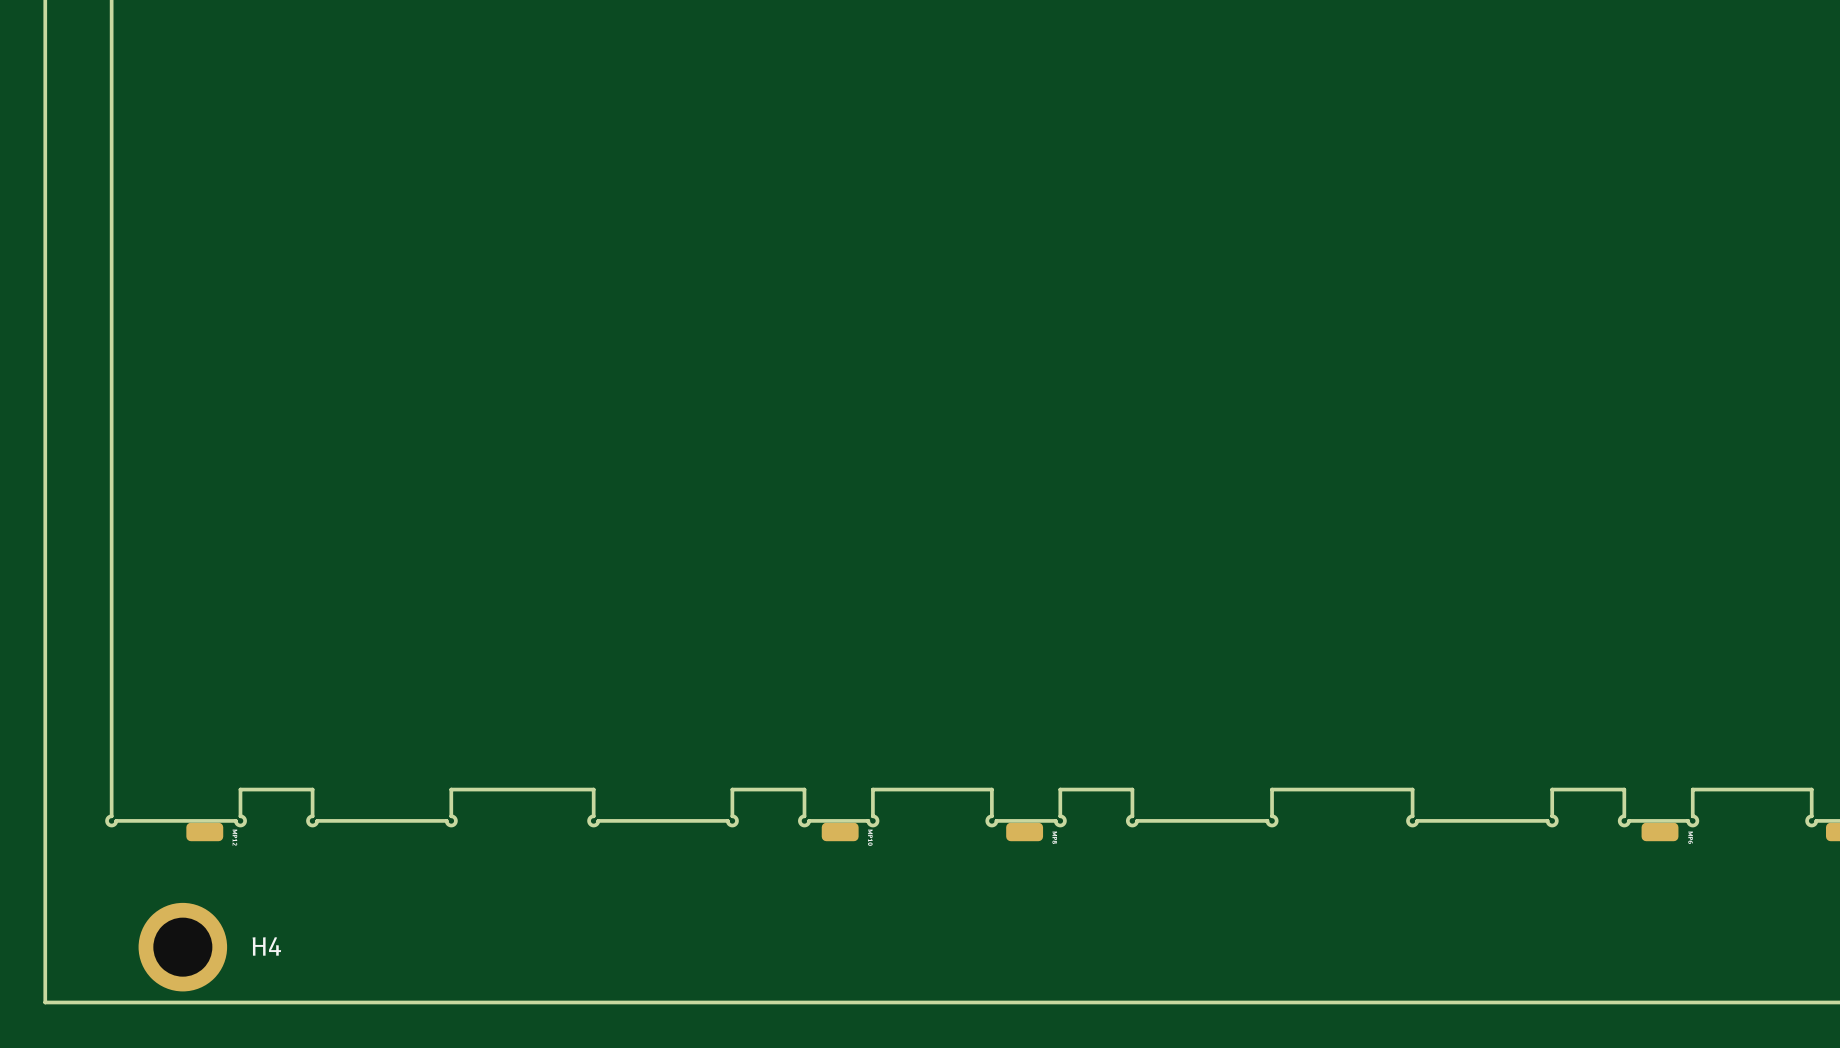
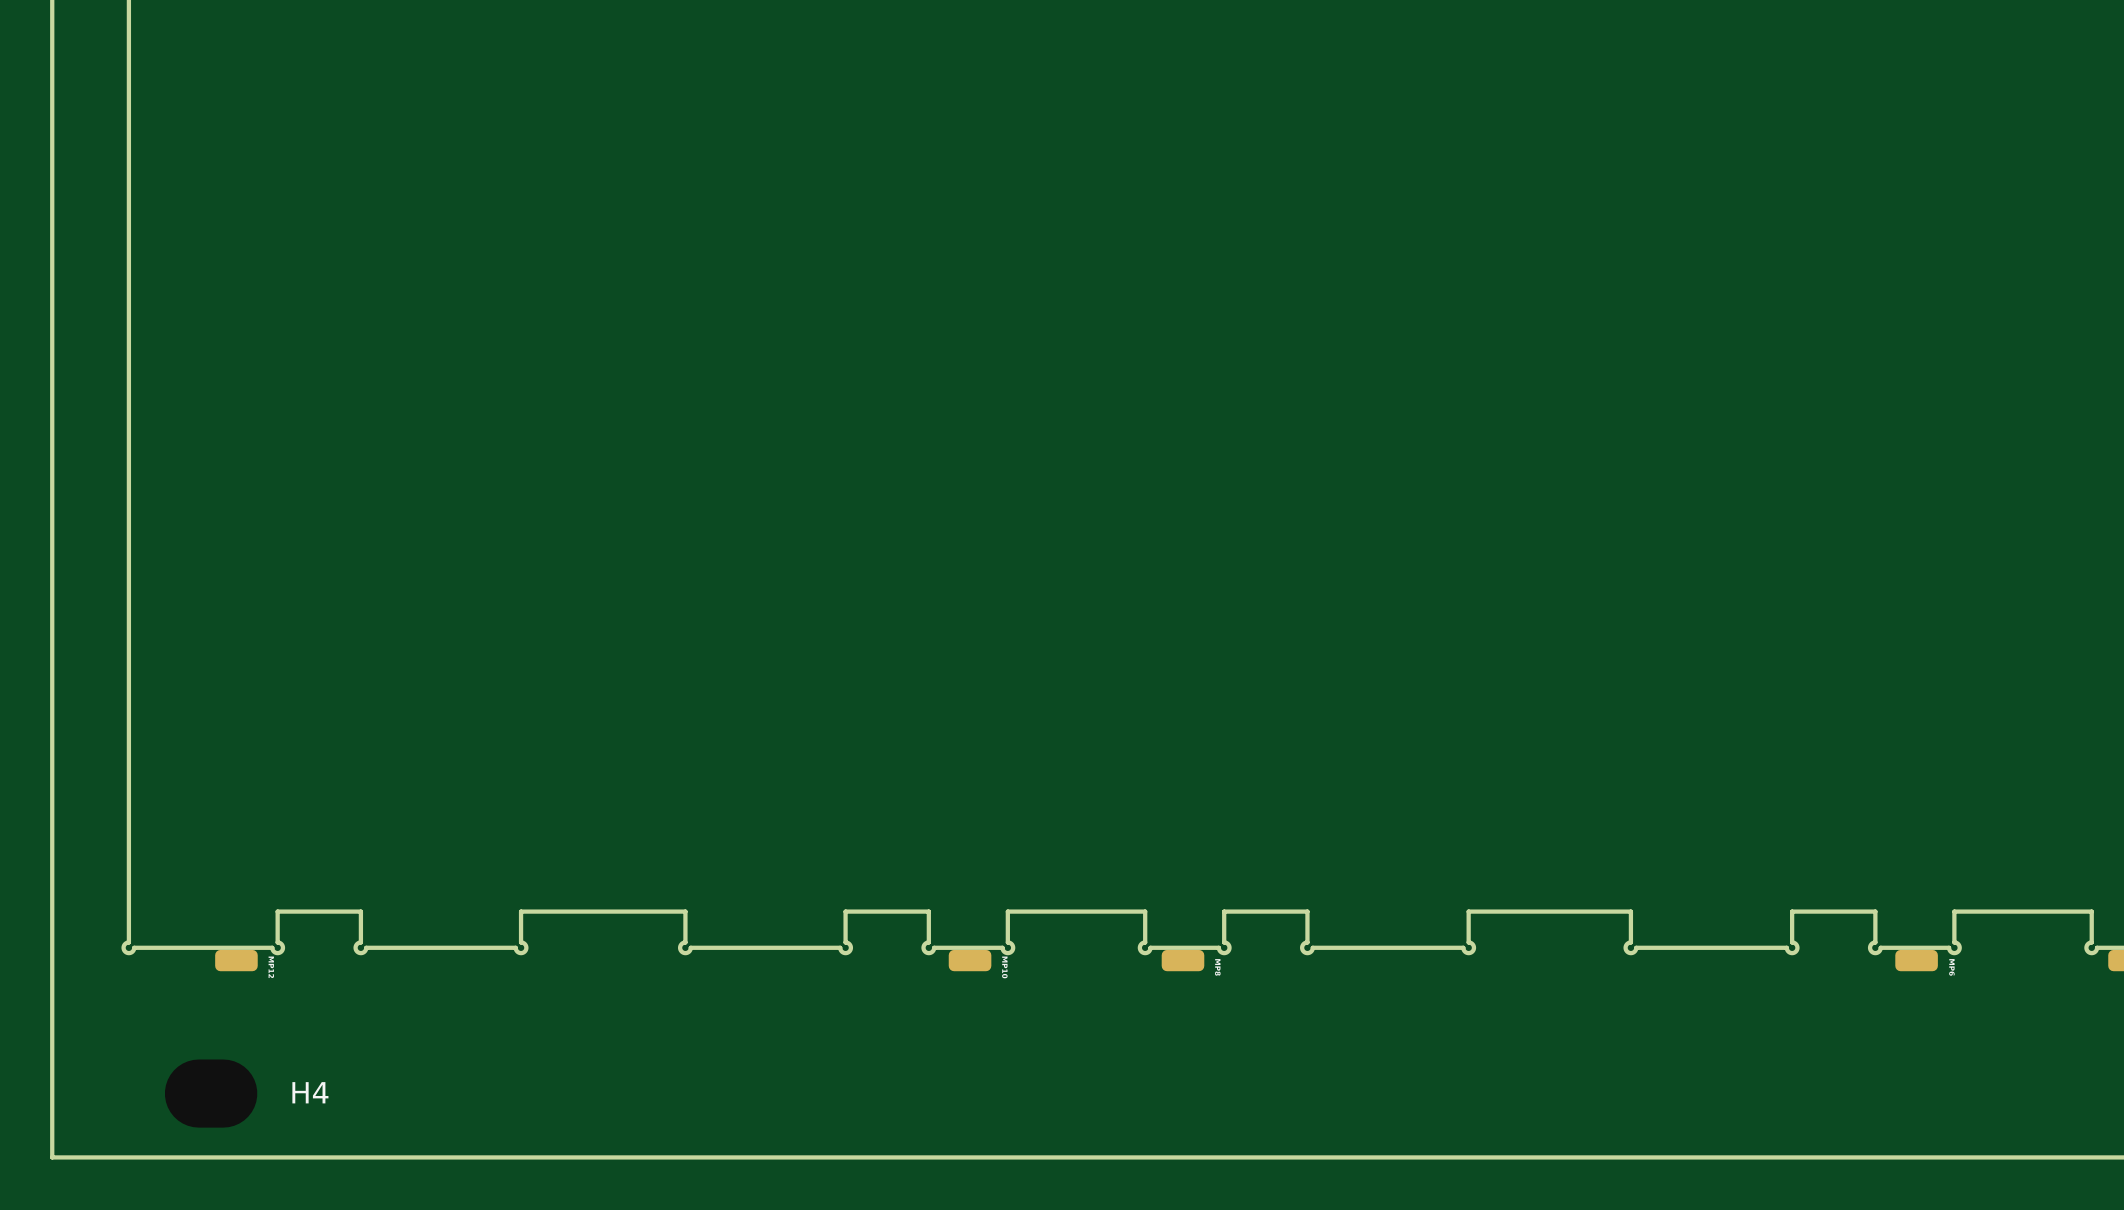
H4 footprint: [138, 902, 228, 992] -> [164, 1059, 258, 1128]

